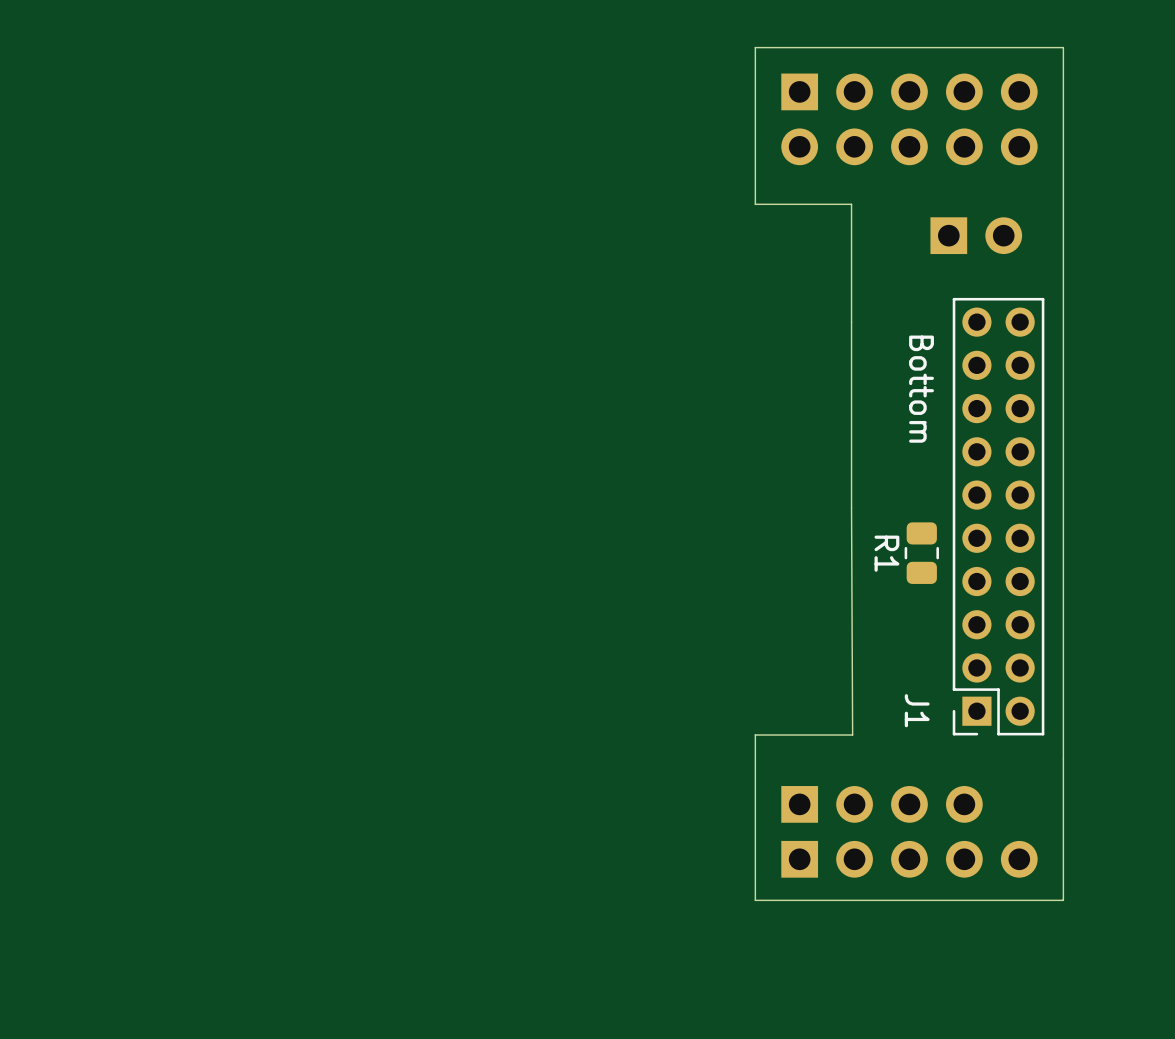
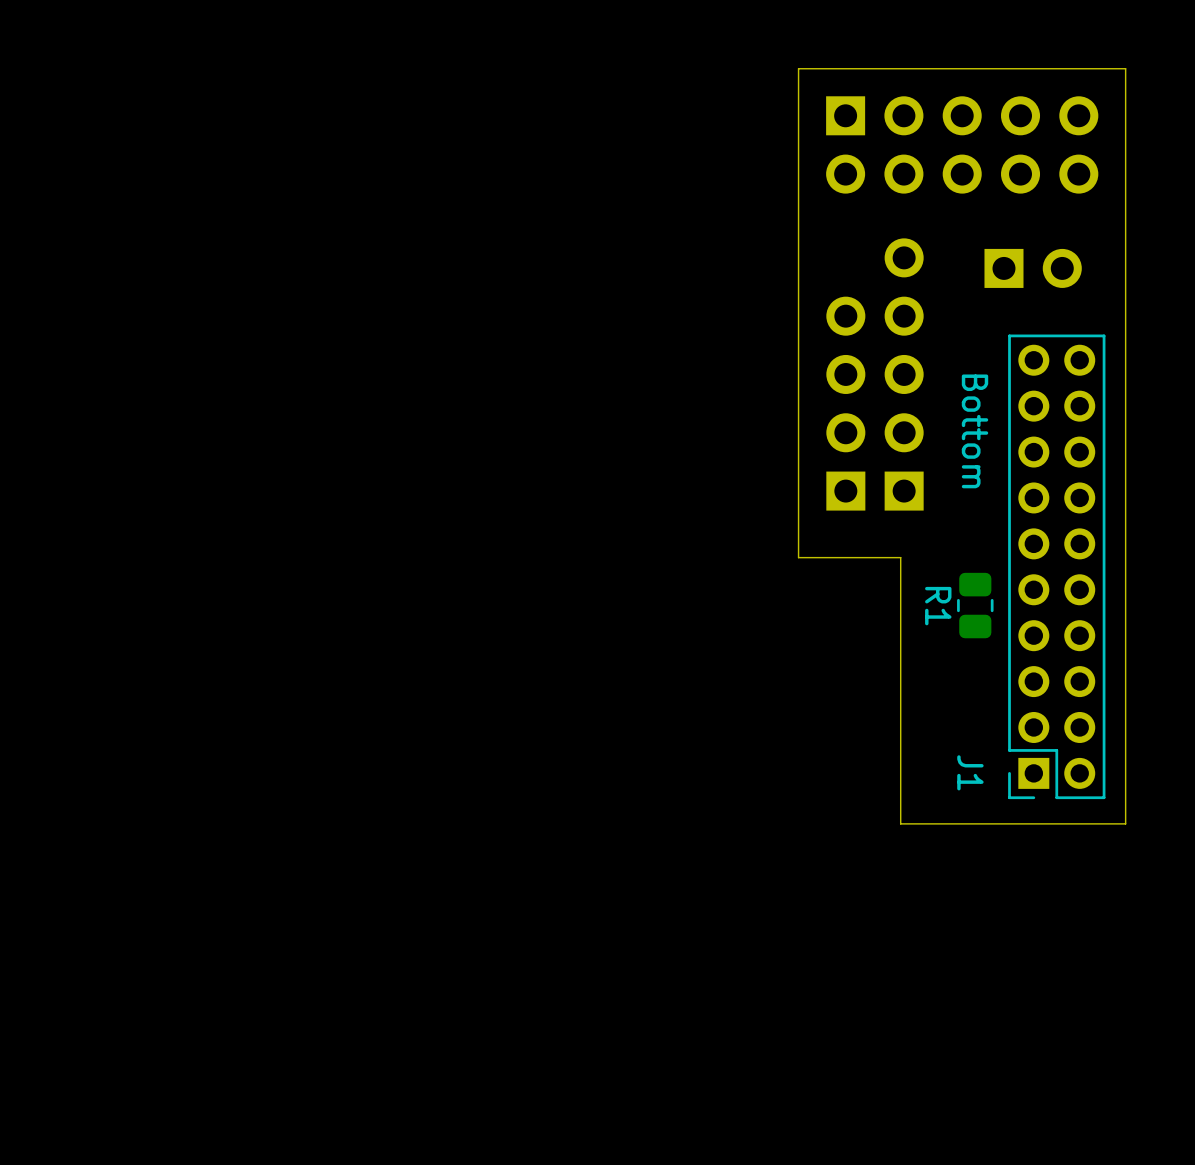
board edge: (755, 204) (851, 204) (852, 735) (755, 735) (755, 900) (1063, 900) (1063, 758) -> (798, 235) (798, 557) (900, 557) (900, 823) (1125, 823)
part rotation: 0° (882, 804) -> 90° counterclockwise (845, 403)
part position: (882, 804) -> (845, 403)
part rotation: 0° (909, 859) -> 90° counterclockwise (904, 374)
part position: (909, 859) -> (904, 374)

